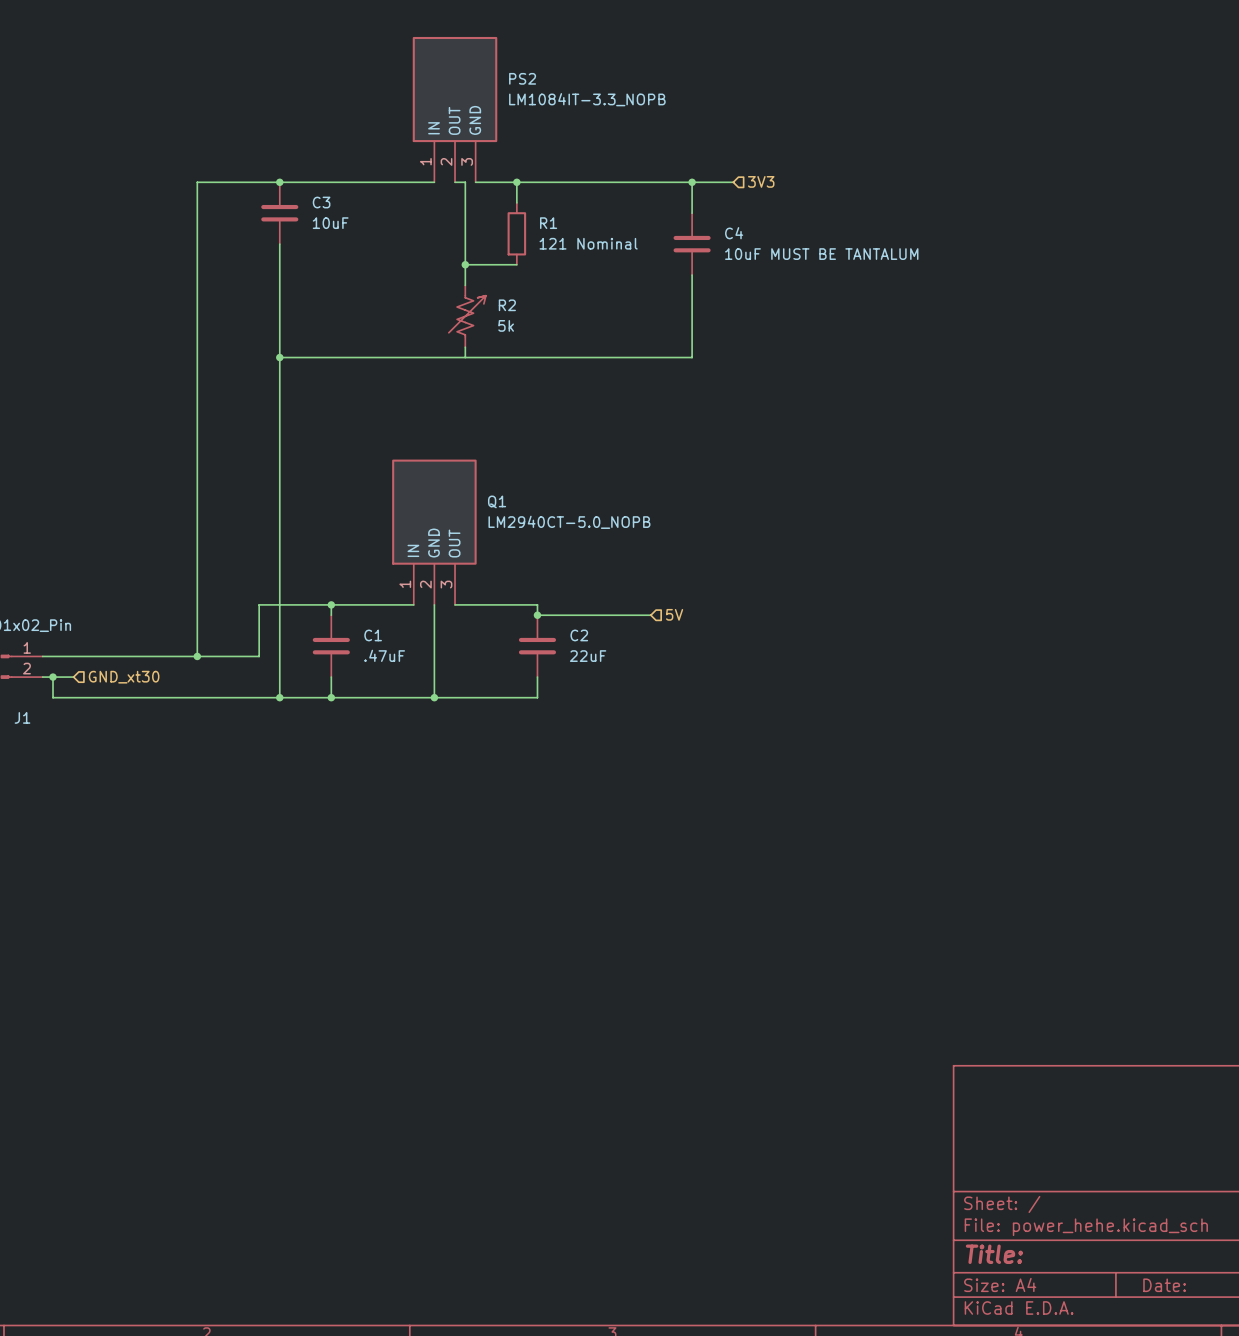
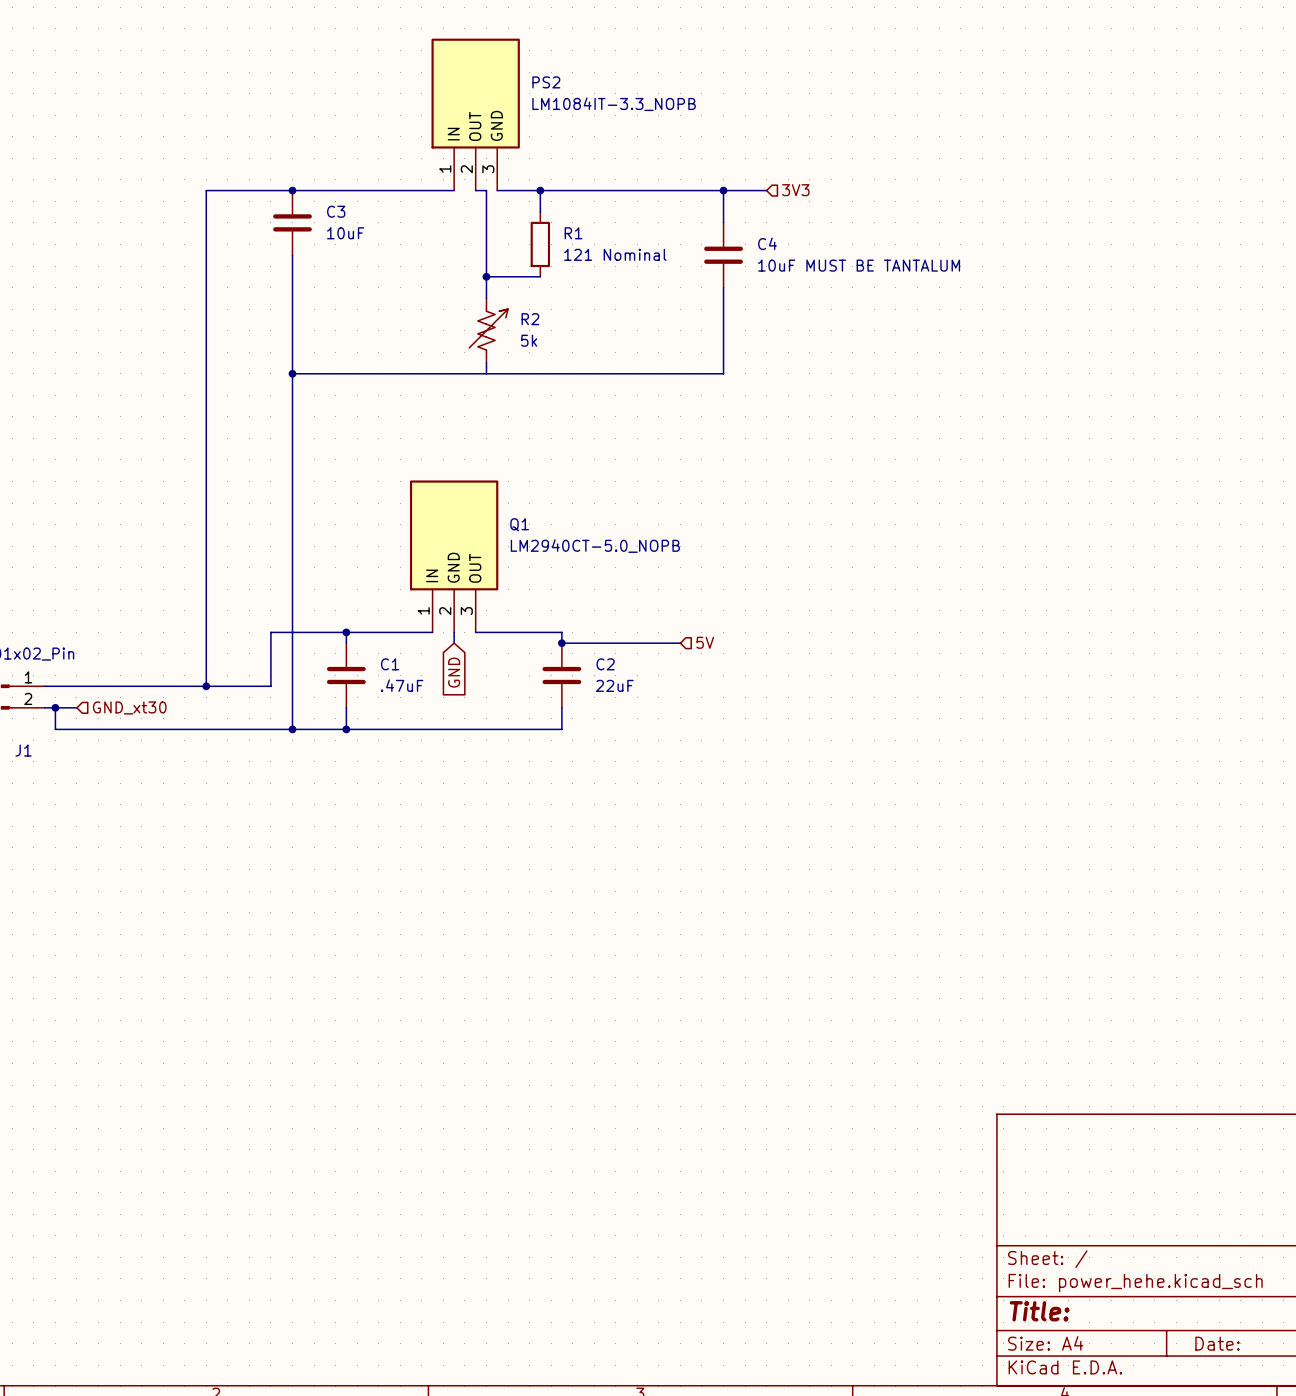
wire: (434, 615) (434, 697) -> none
global label: none -> GND (454, 672)
junction: (434, 697) -> none

